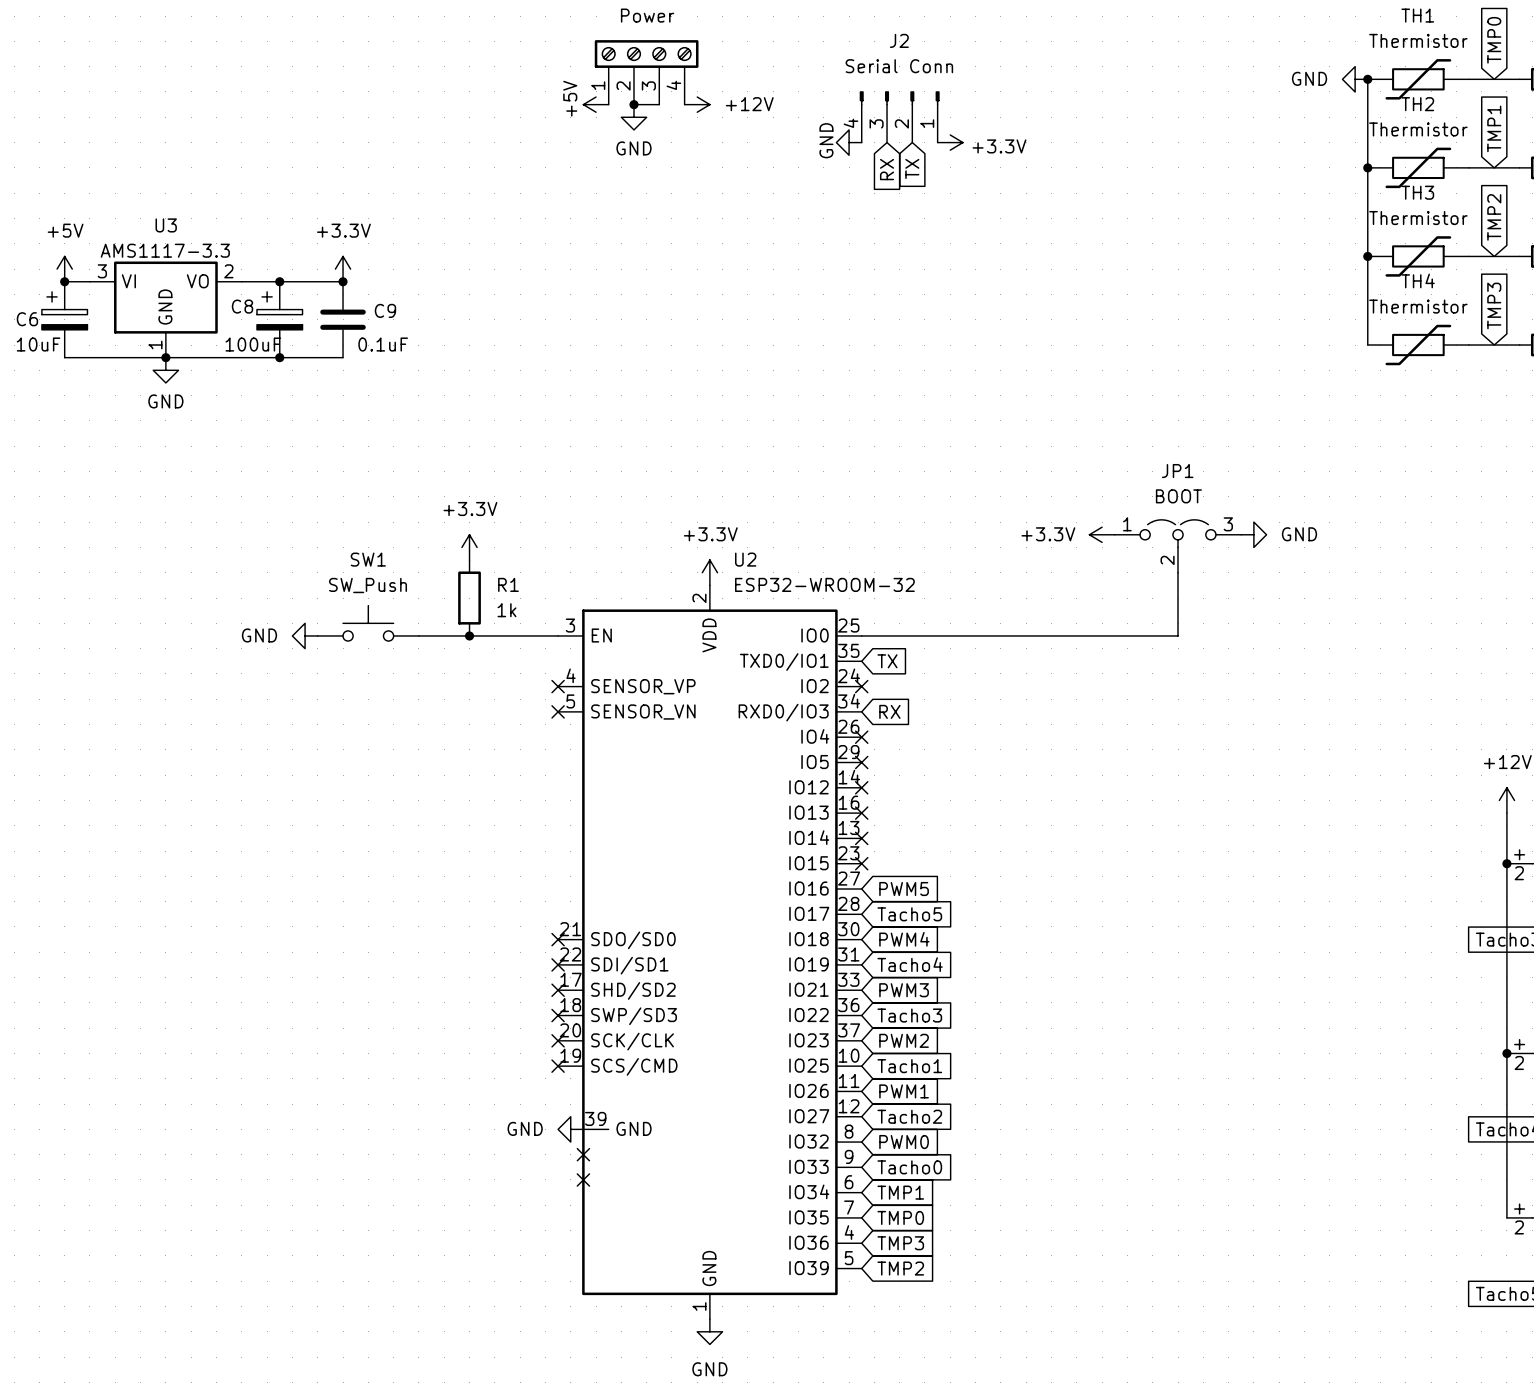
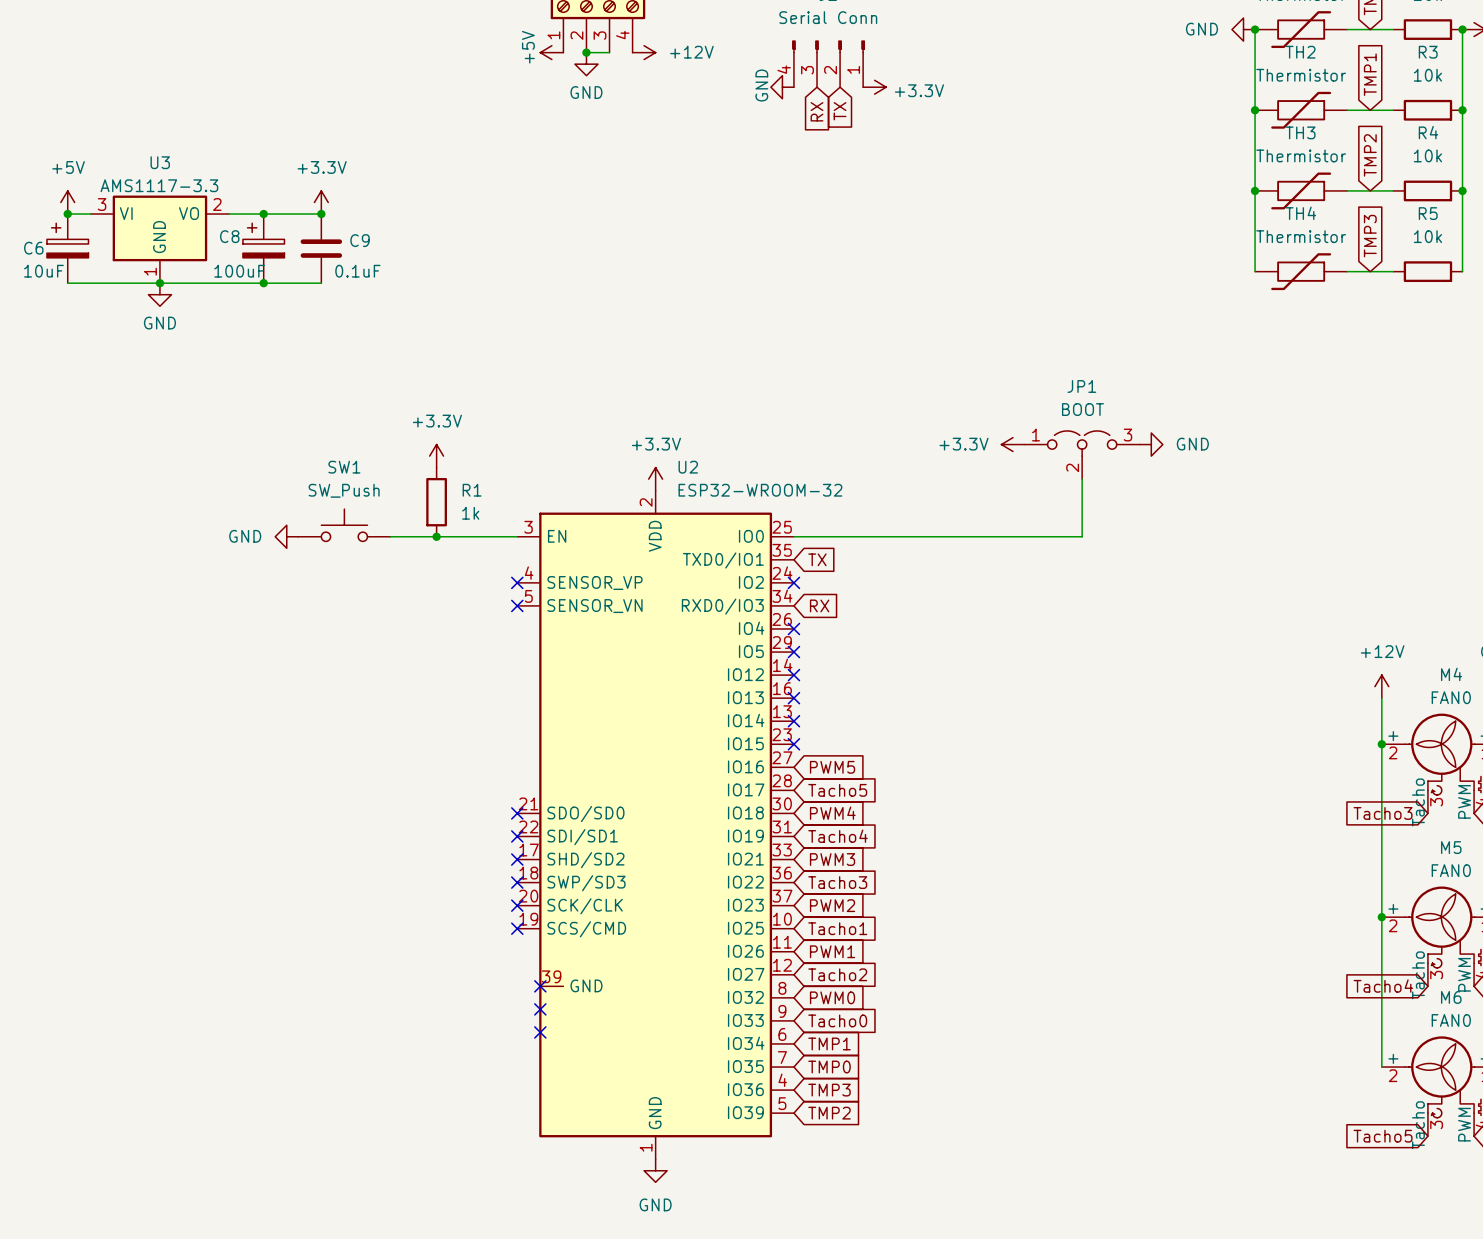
power symbol: GND (570, 1129) -> none
no-connect mark: none -> (540, 986)

